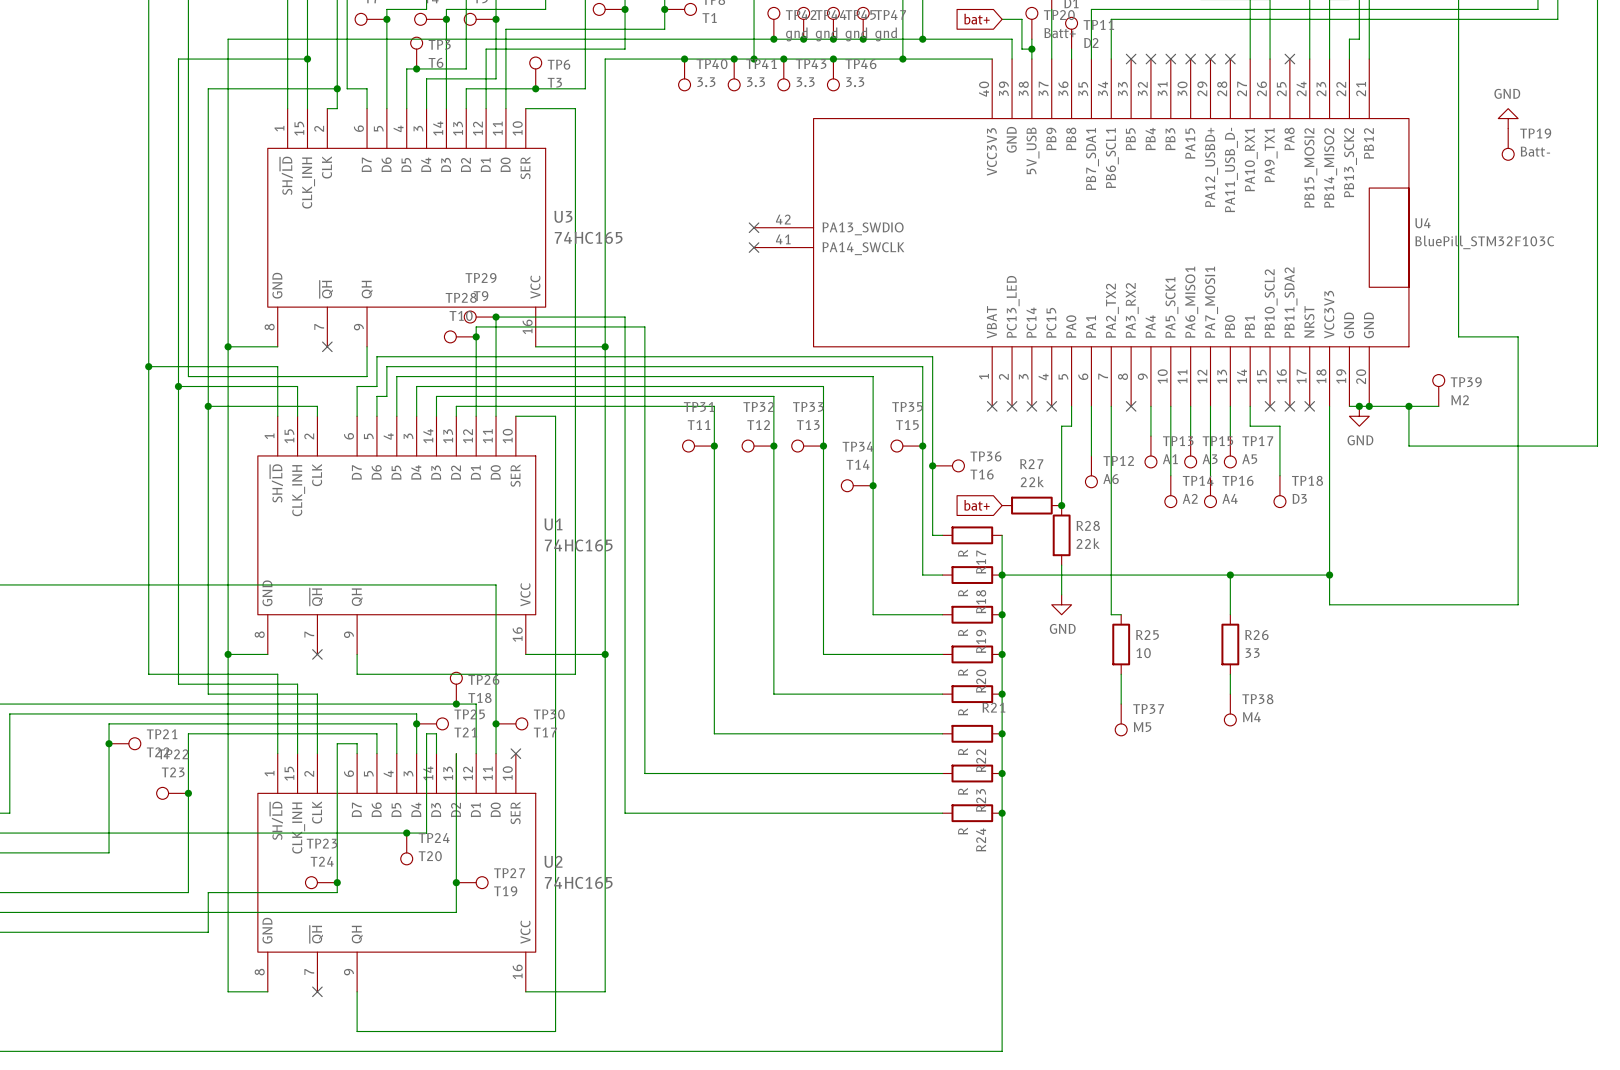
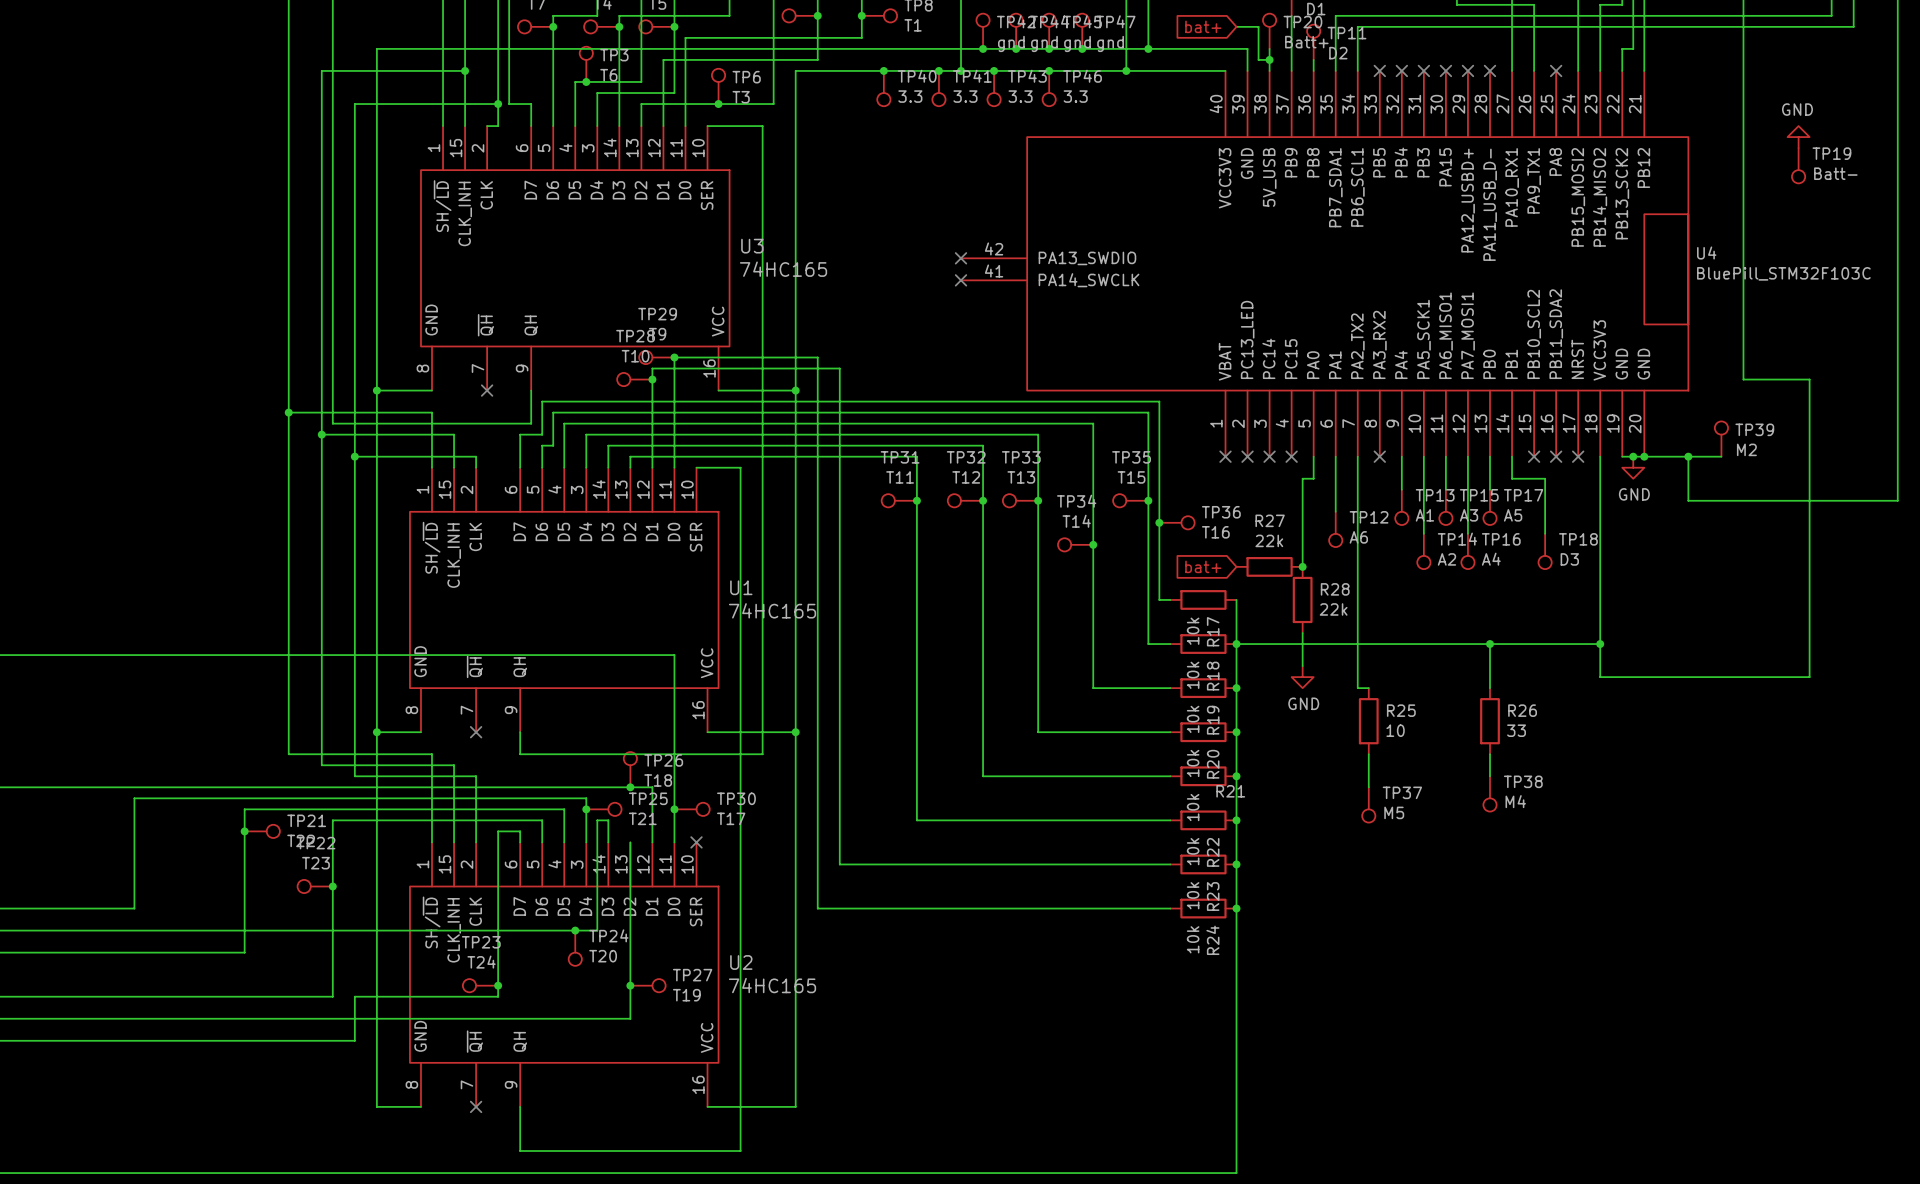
R17 value: R (963, 553) -> 10k (1193, 631)
R18 value: R (963, 592) -> 10k (1193, 675)
R19 value: R (963, 632) -> 10k (1193, 719)
R20 value: R (963, 672) -> 10k (1193, 763)
R21 value: R (963, 711) -> 10k (1193, 807)
R22 value: R (963, 751) -> 10k (1193, 851)
R23 value: R (963, 791) -> 10k (1193, 895)
R24 value: R (963, 831) -> 10k (1193, 939)

